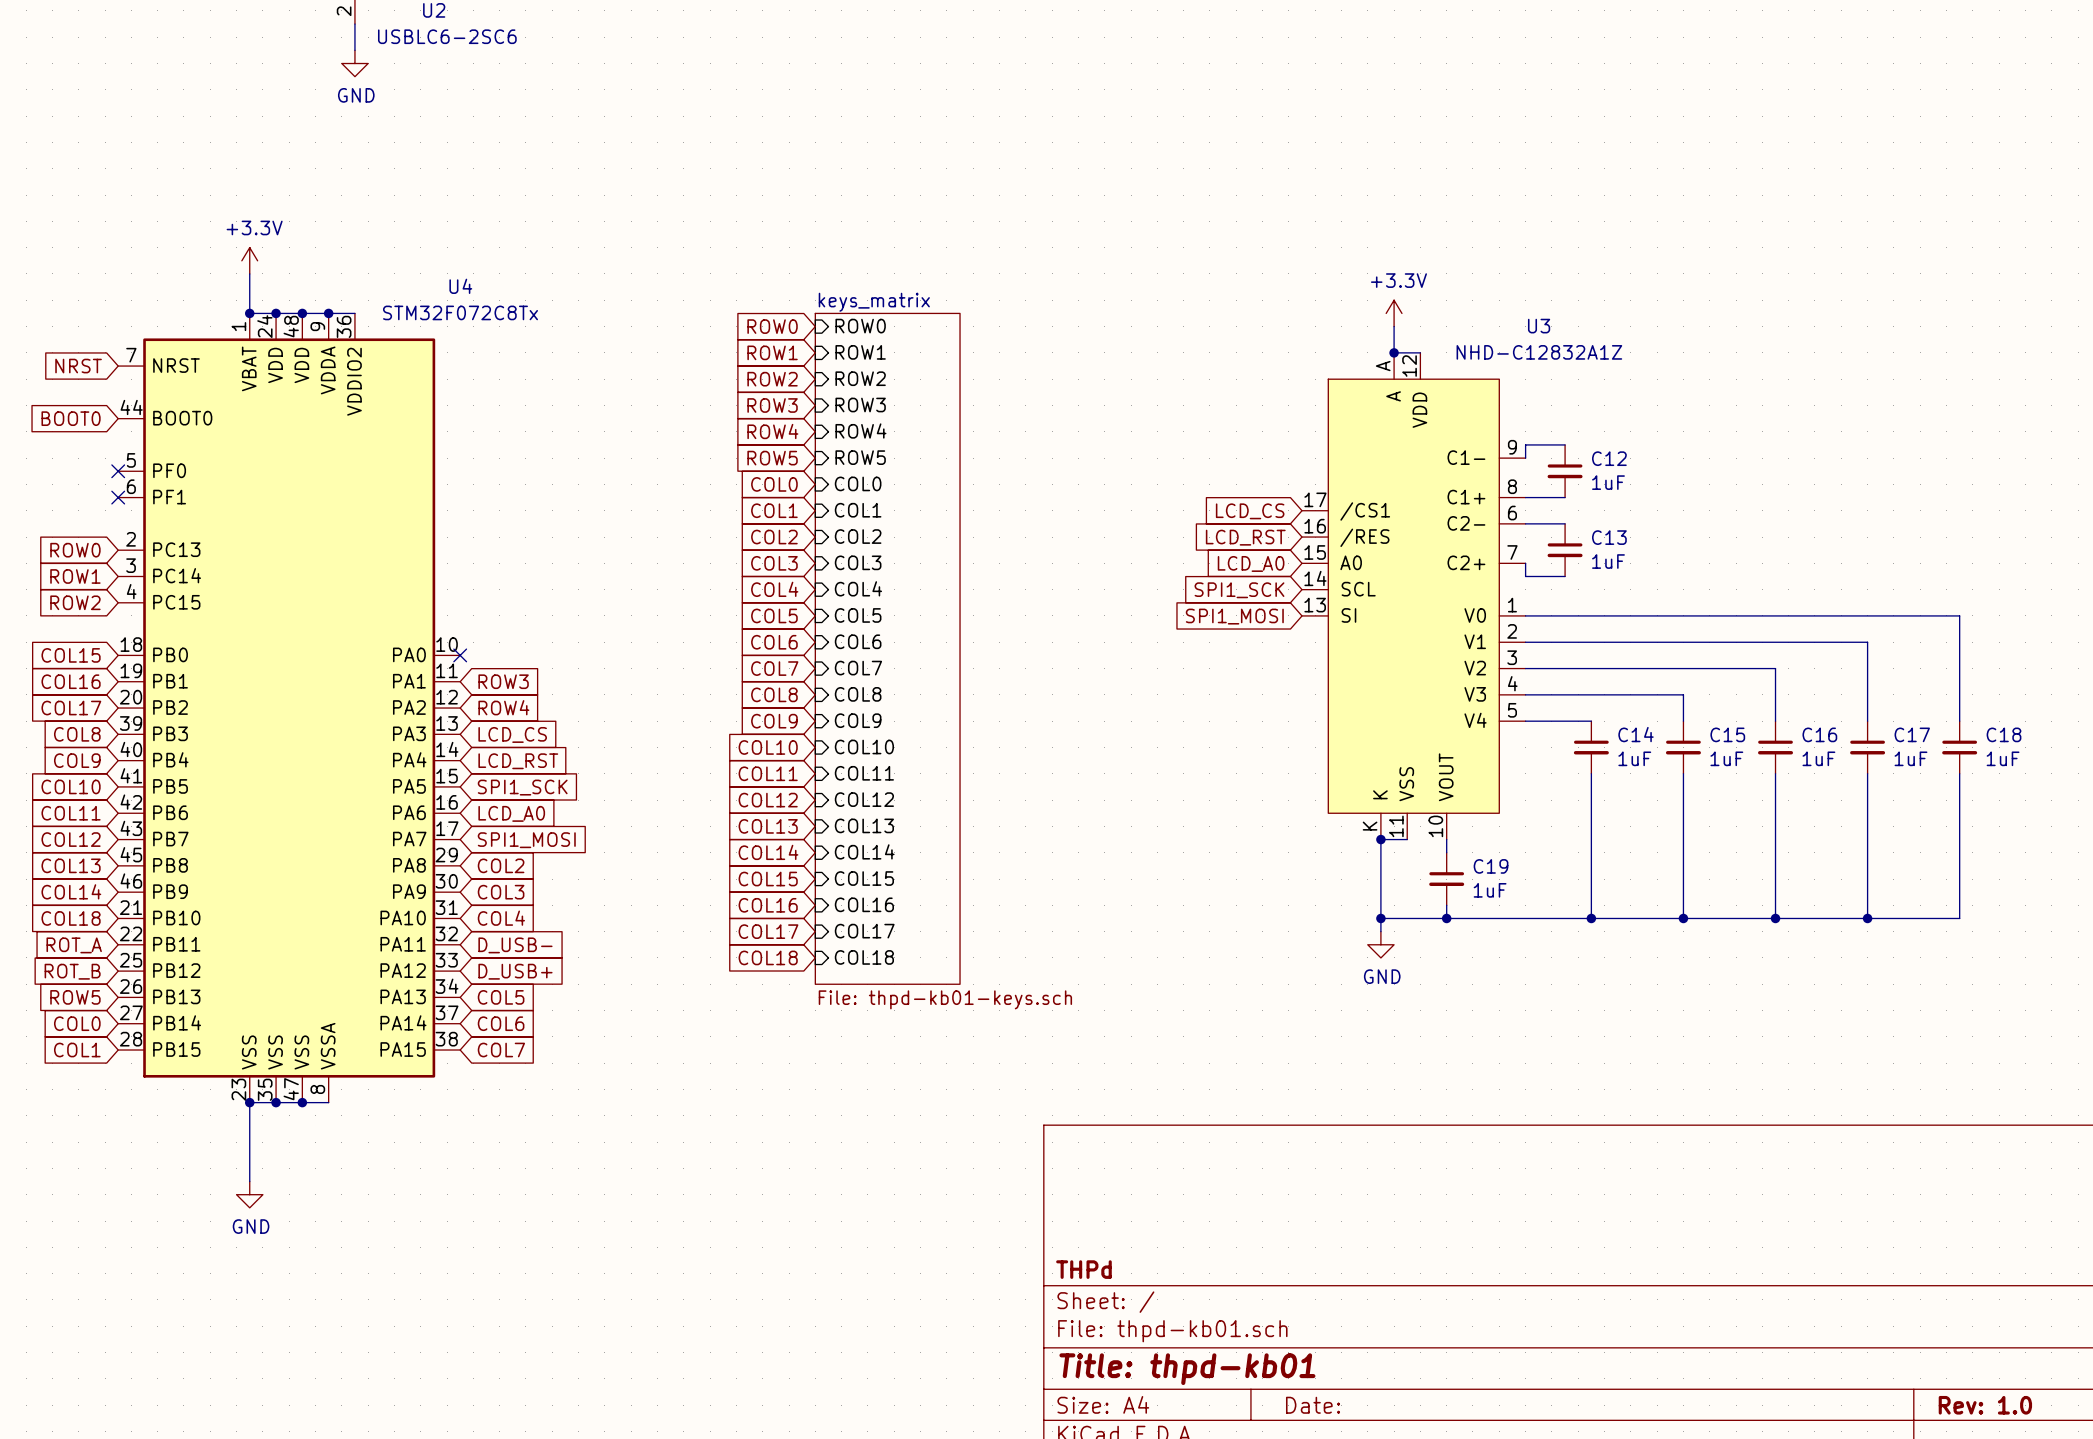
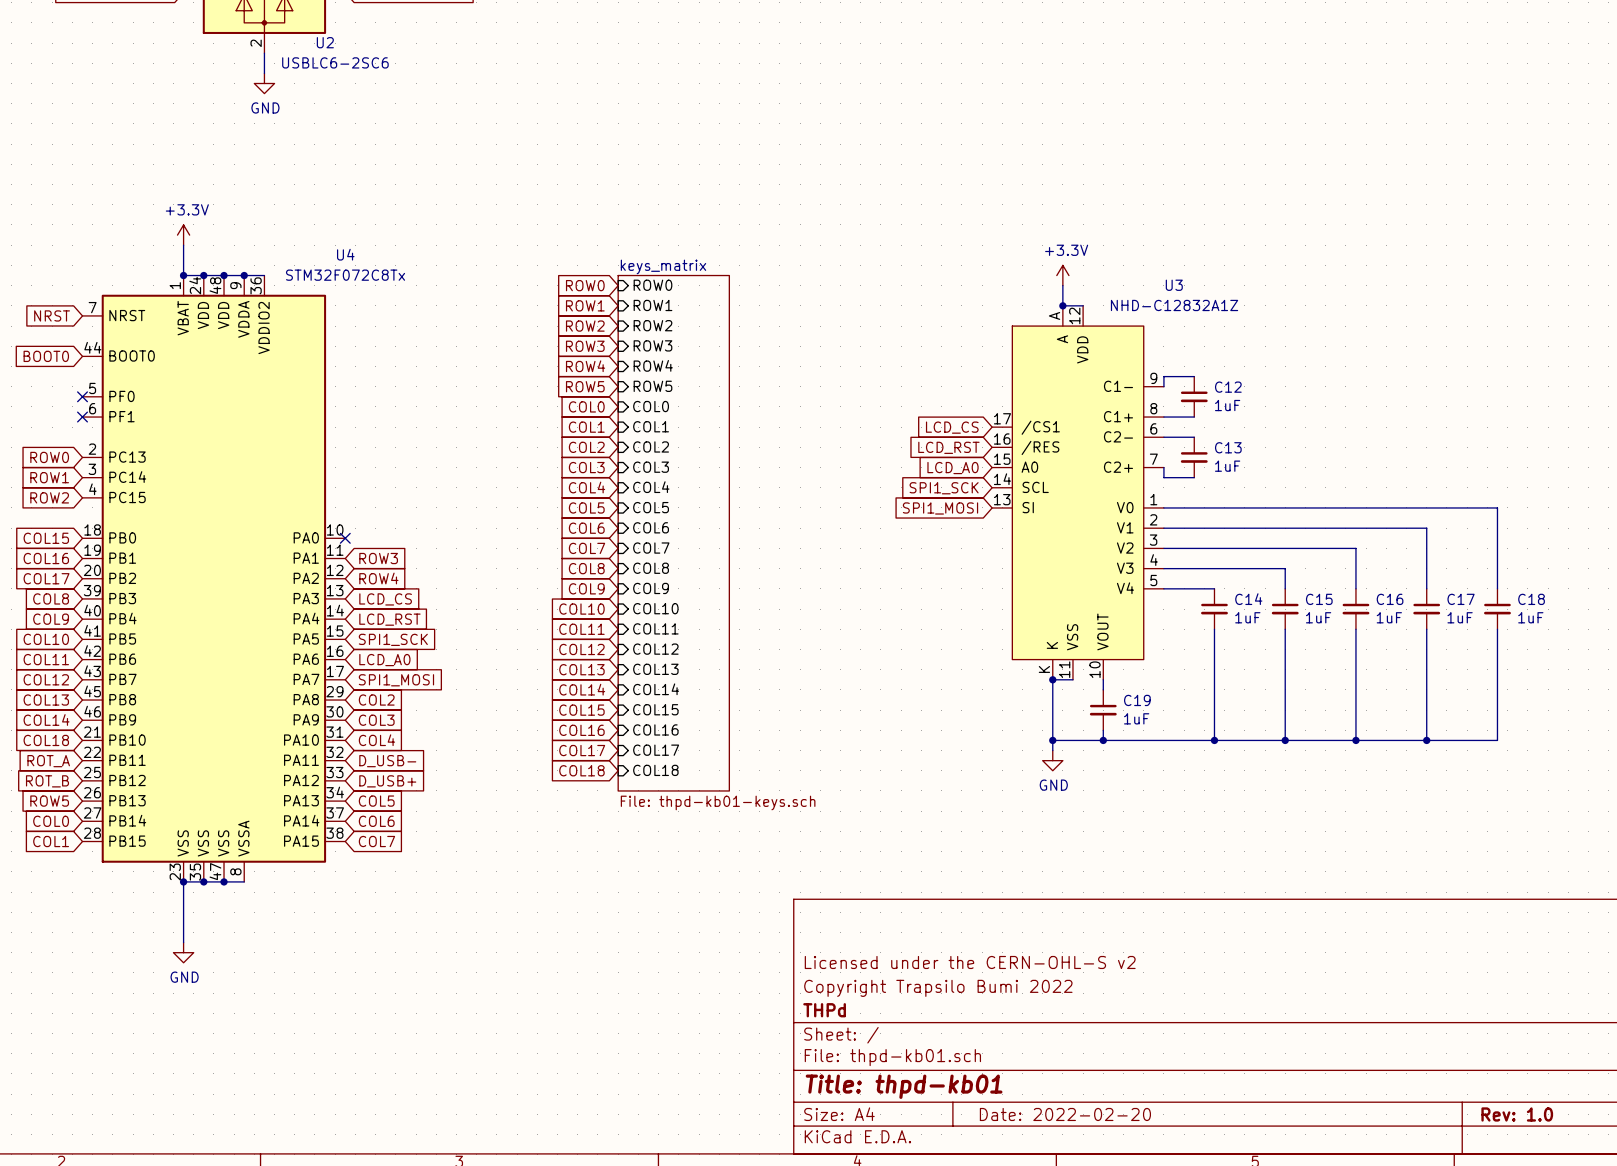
title block: none -> Licensed under the CERN-OHL-S v2 (970, 962)
title block: none -> Copyright Trapsilo Bumi 2022 (938, 988)
title block: Date: (1313, 1405) -> Date: 2022-02-20 (1065, 1114)

